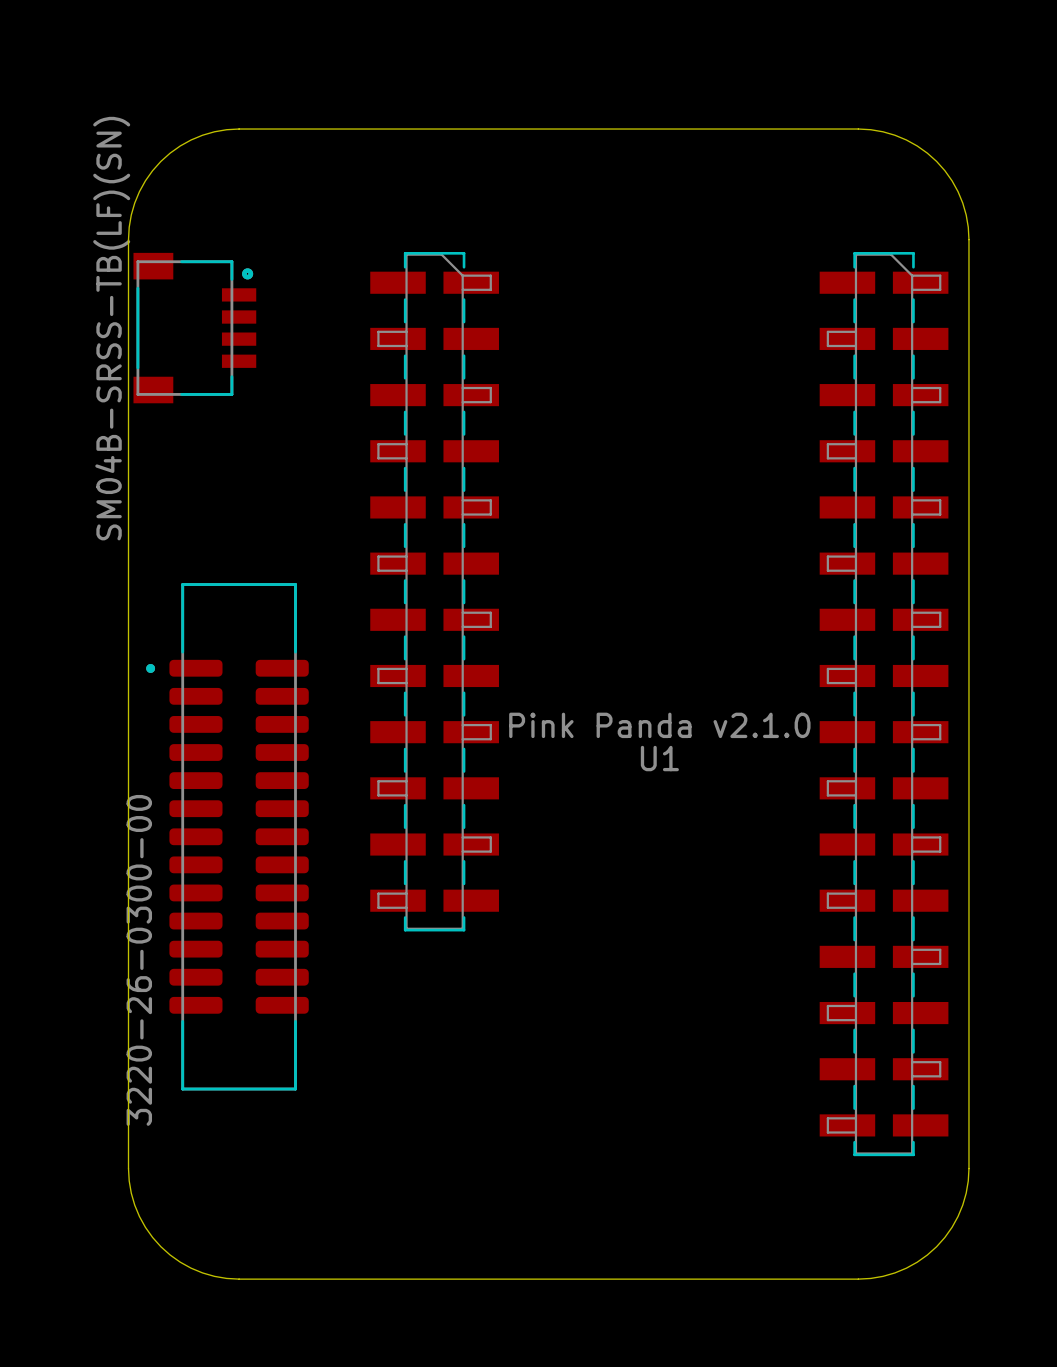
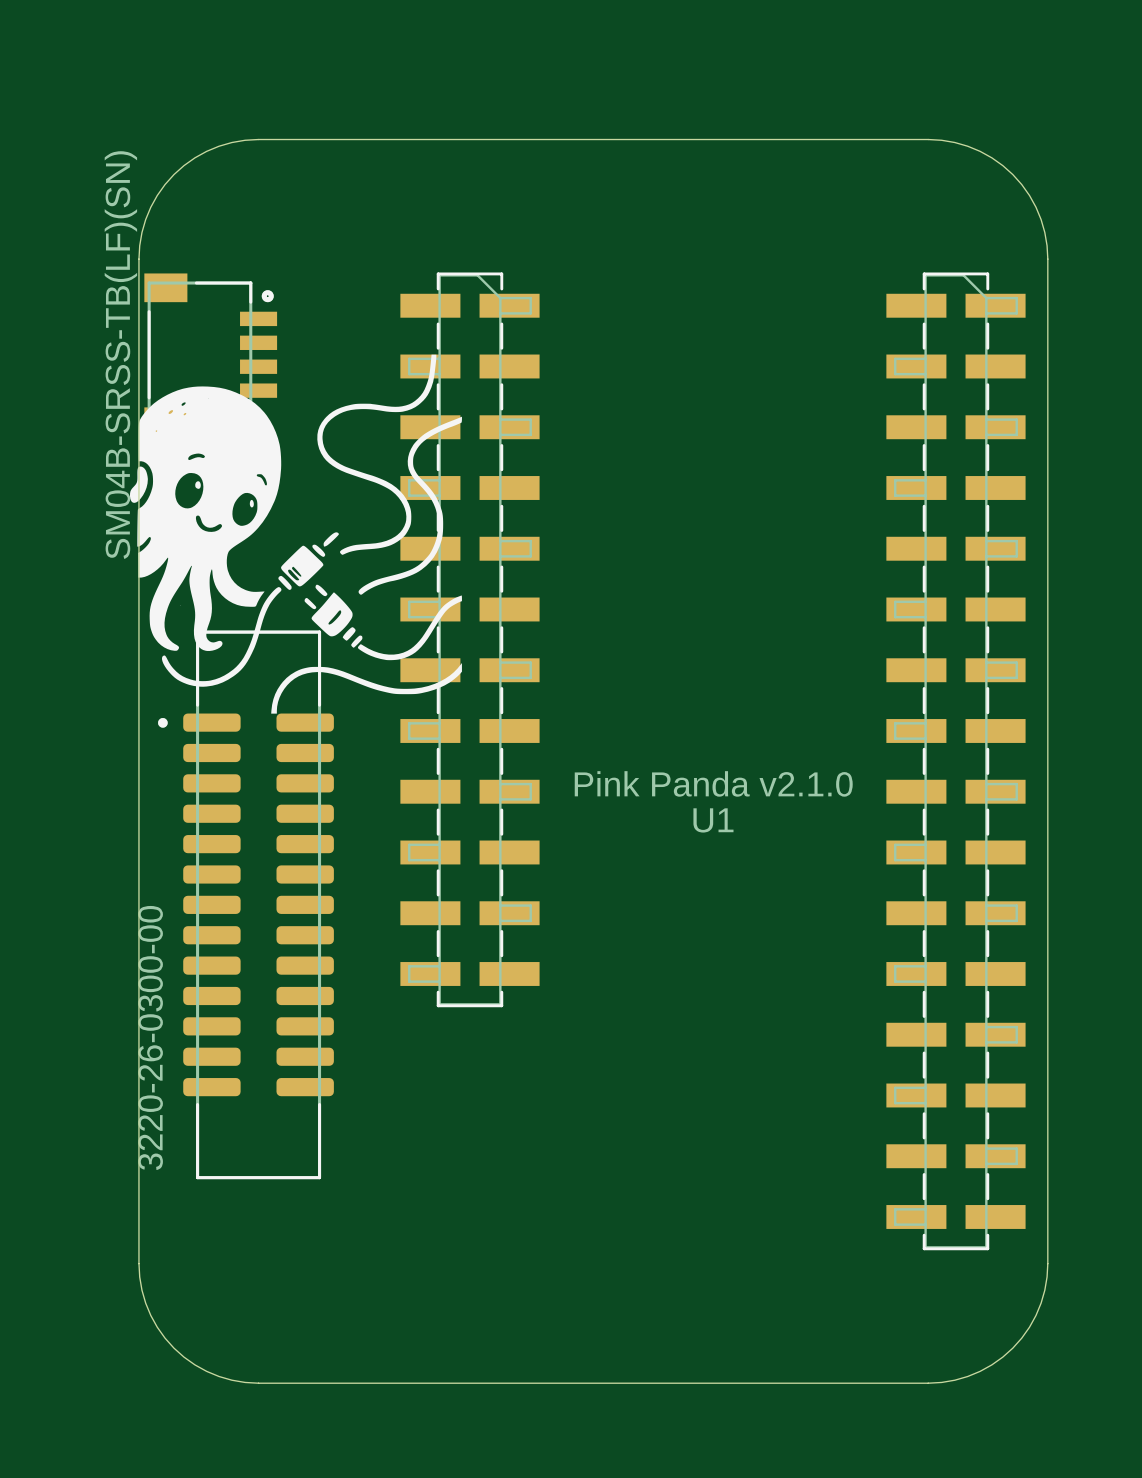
drawing: none -> [129, 354, 462, 714]

